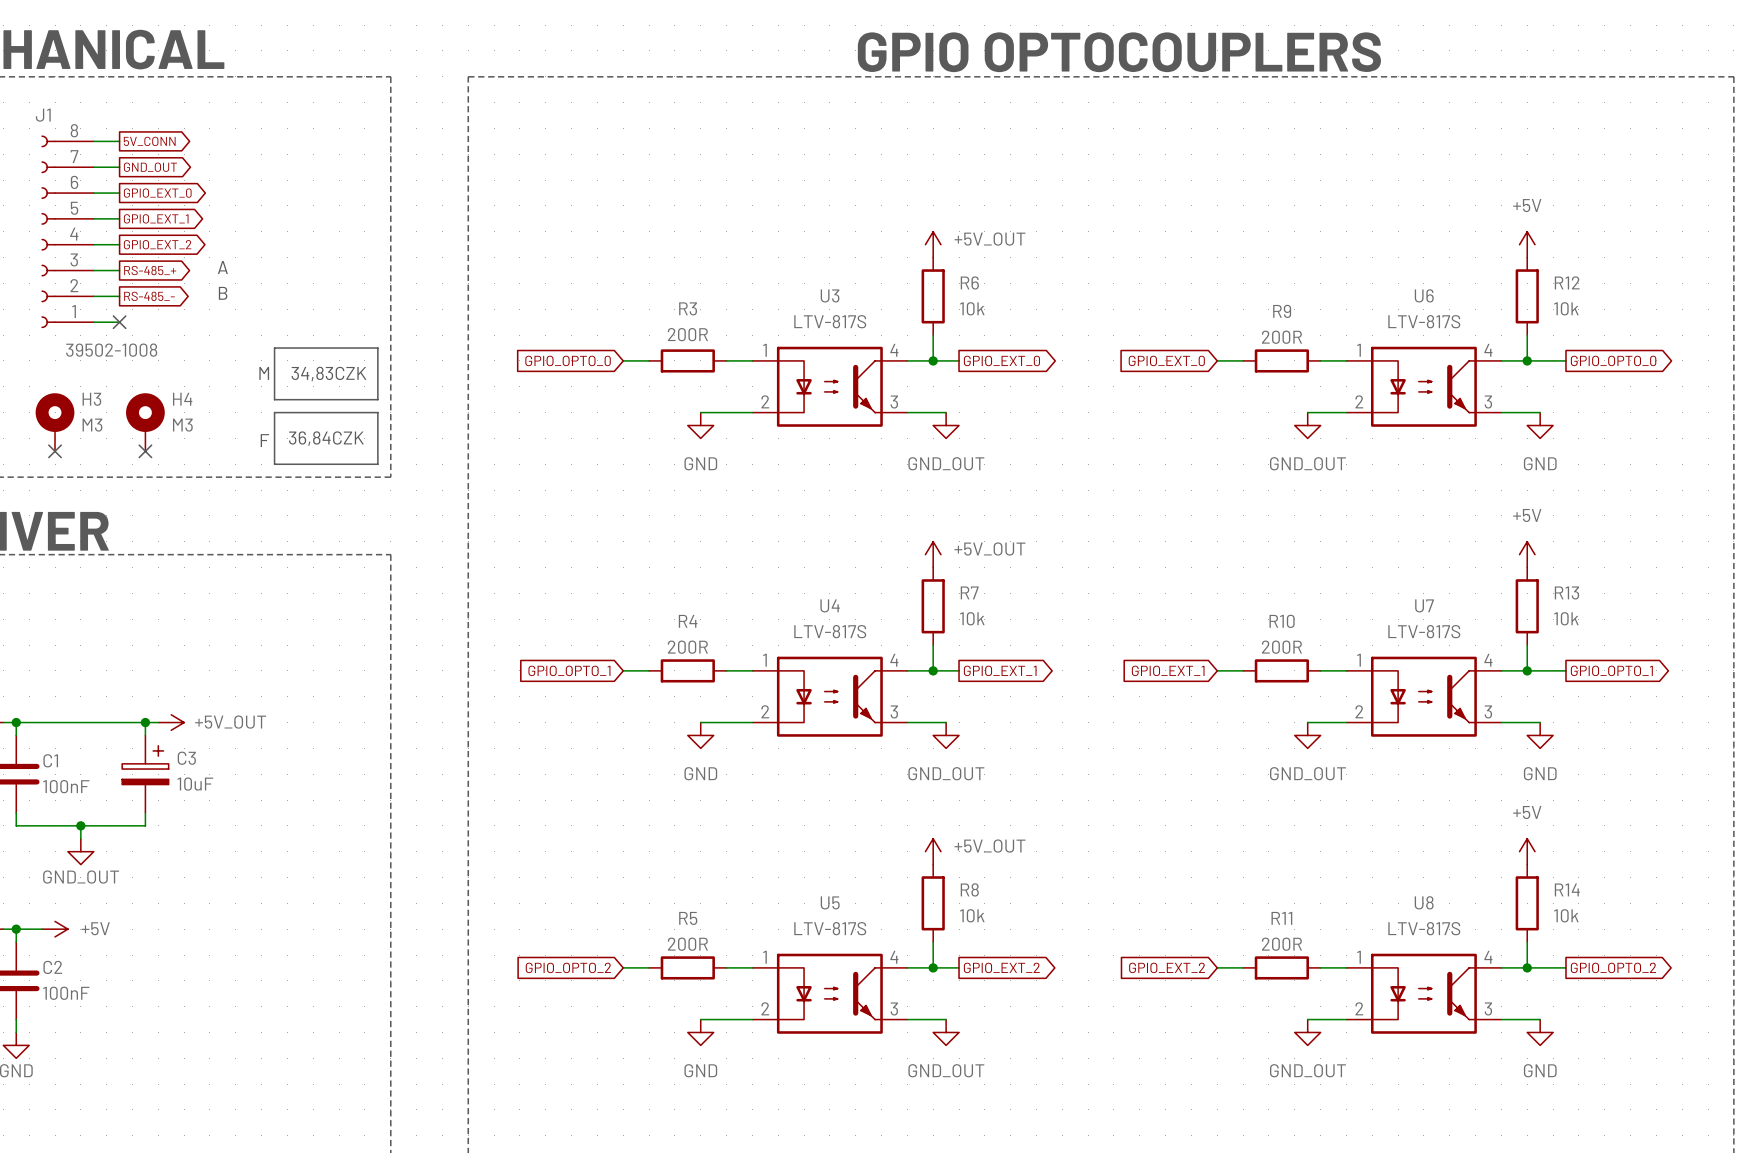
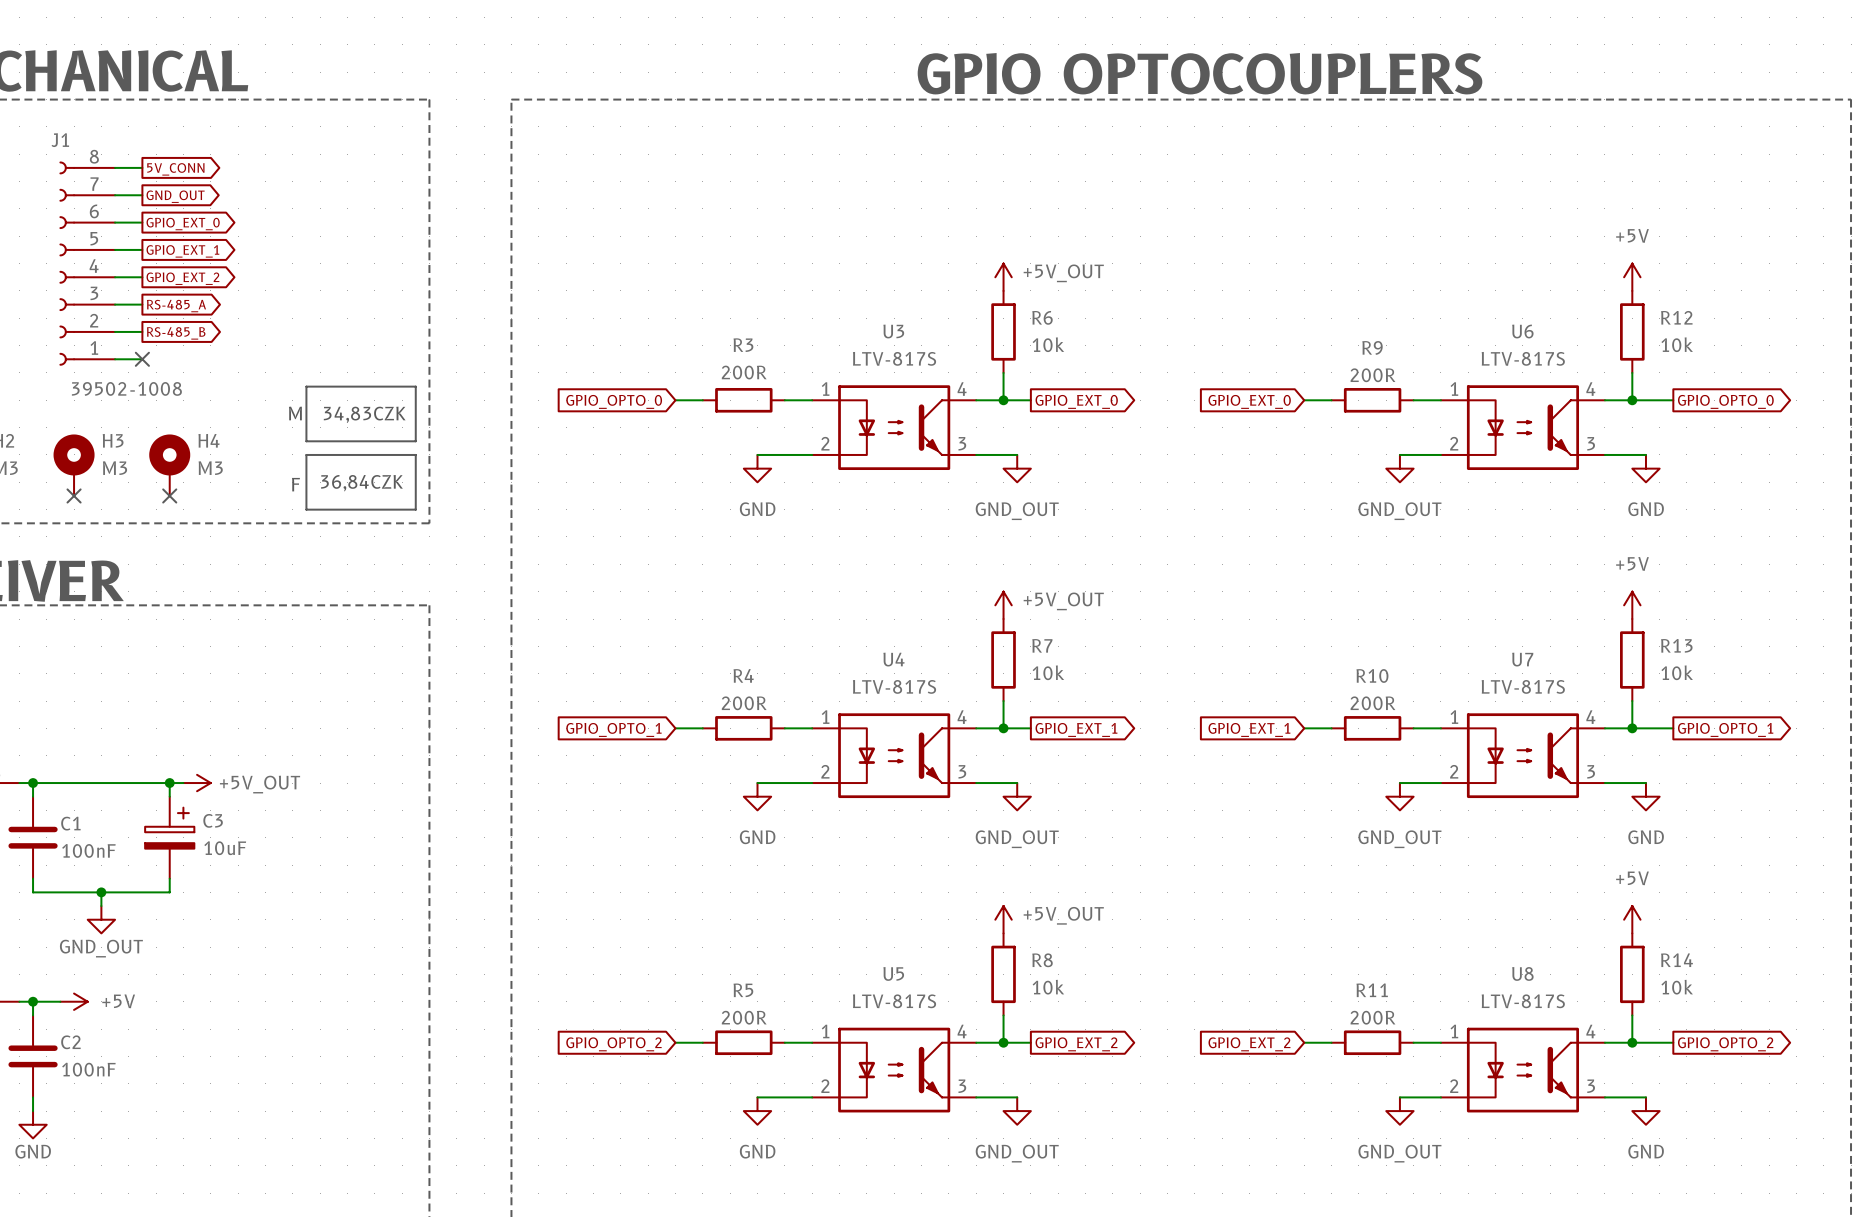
text: A (222, 267) -> none
global label: RS-485_+ (150, 270) -> RS-485_A (176, 306)
text: B (223, 293) -> none
global label: RS-485_- (149, 296) -> RS-485_B (176, 333)

